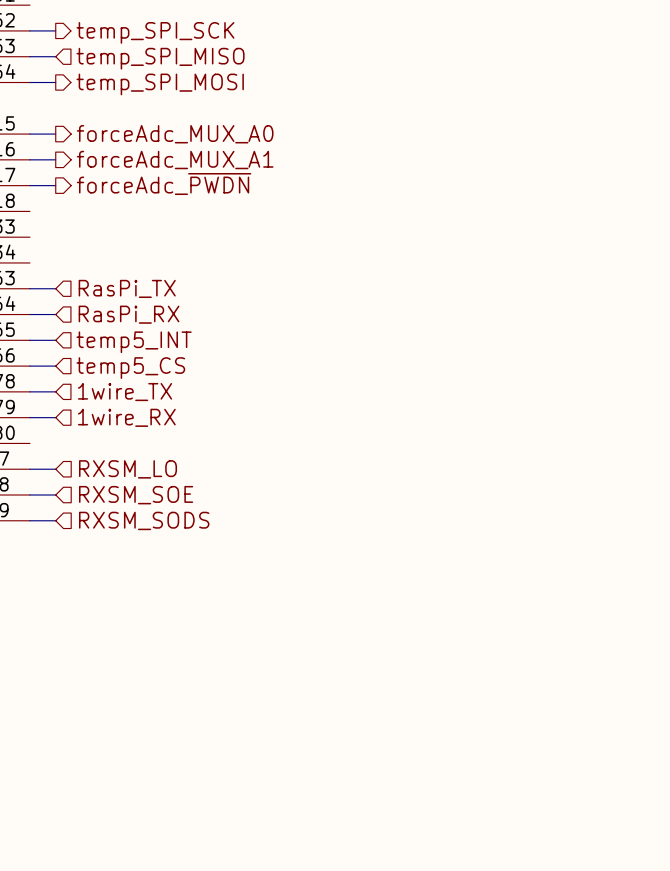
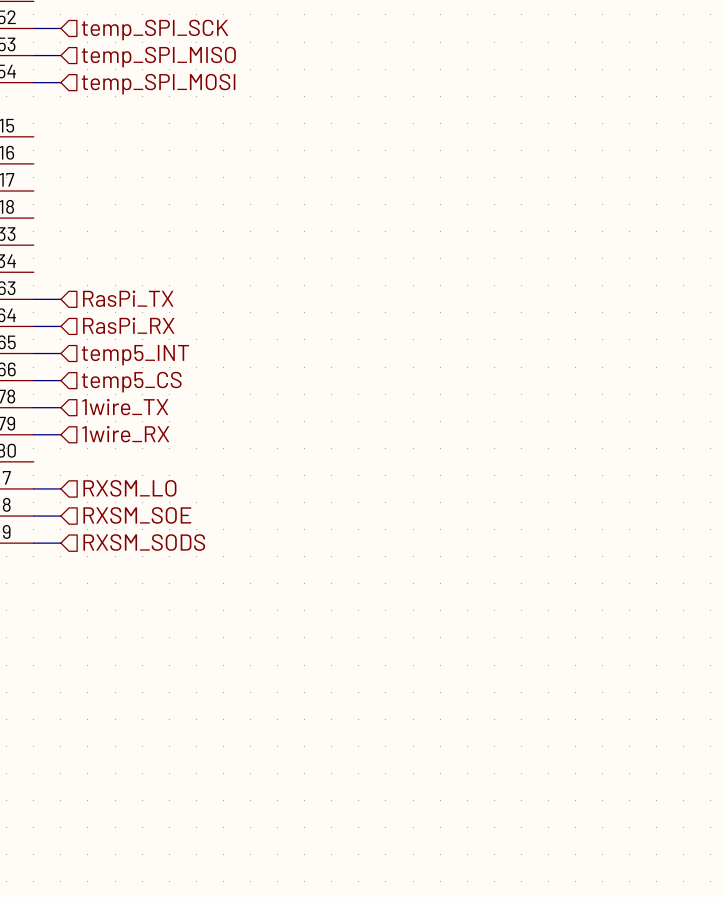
hierarchical label shape: output (155, 32) -> input (154, 30)
hierarchical label shape: output (160, 84) -> input (158, 84)
wire: (29, 134) (55, 134) -> none
hierarchical label: forceAdc_MUX_A0 (175, 134) -> none
wire: (29, 159) (55, 159) -> none
hierarchical label: forceAdc_MUX_A1 (175, 160) -> none
hierarchical label: forceAdc_~{PWDN} (164, 184) -> none
wire: (29, 185) (55, 185) -> none

